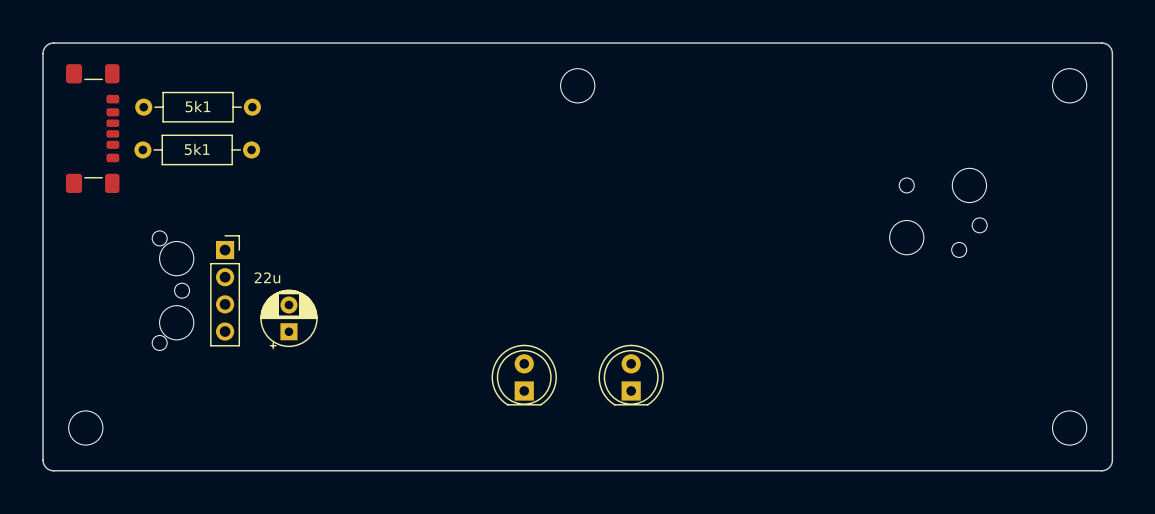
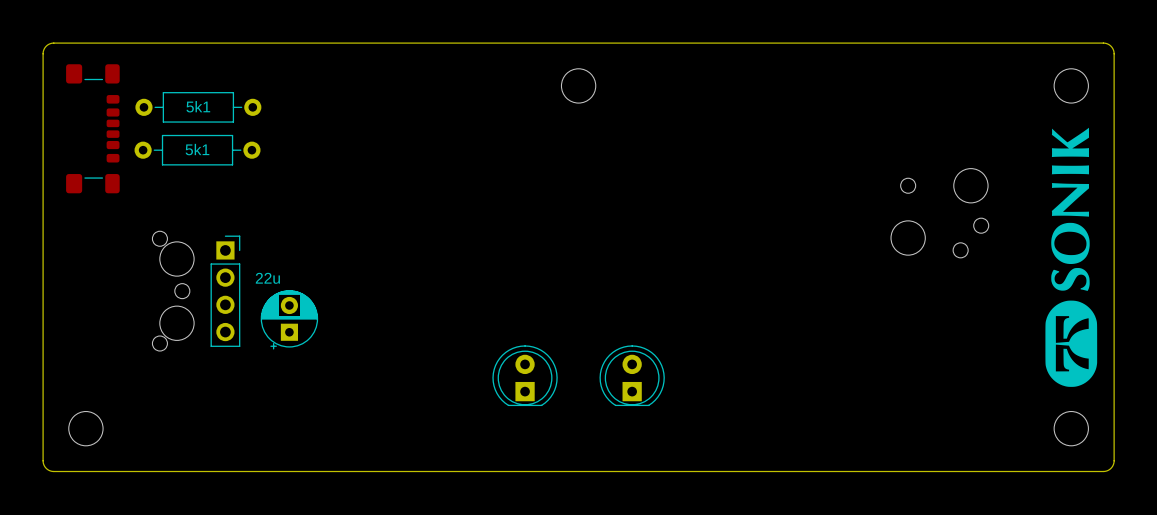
drawing: none -> [1045, 127, 1098, 387]

